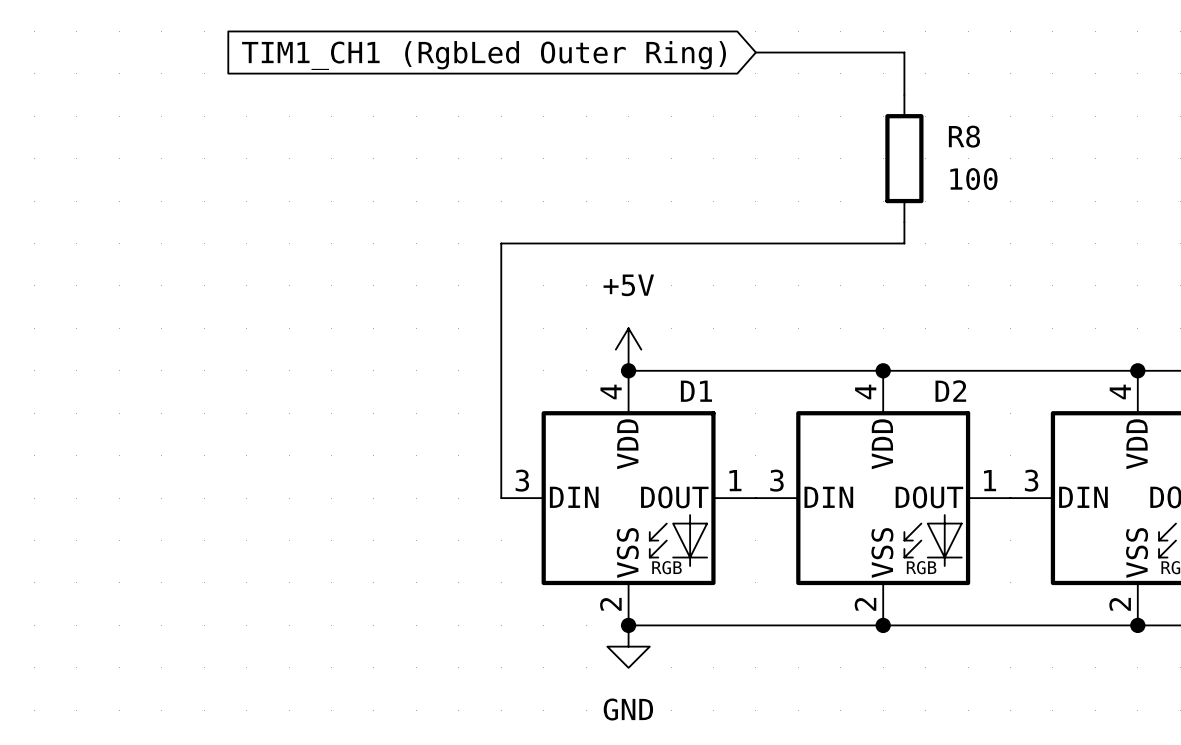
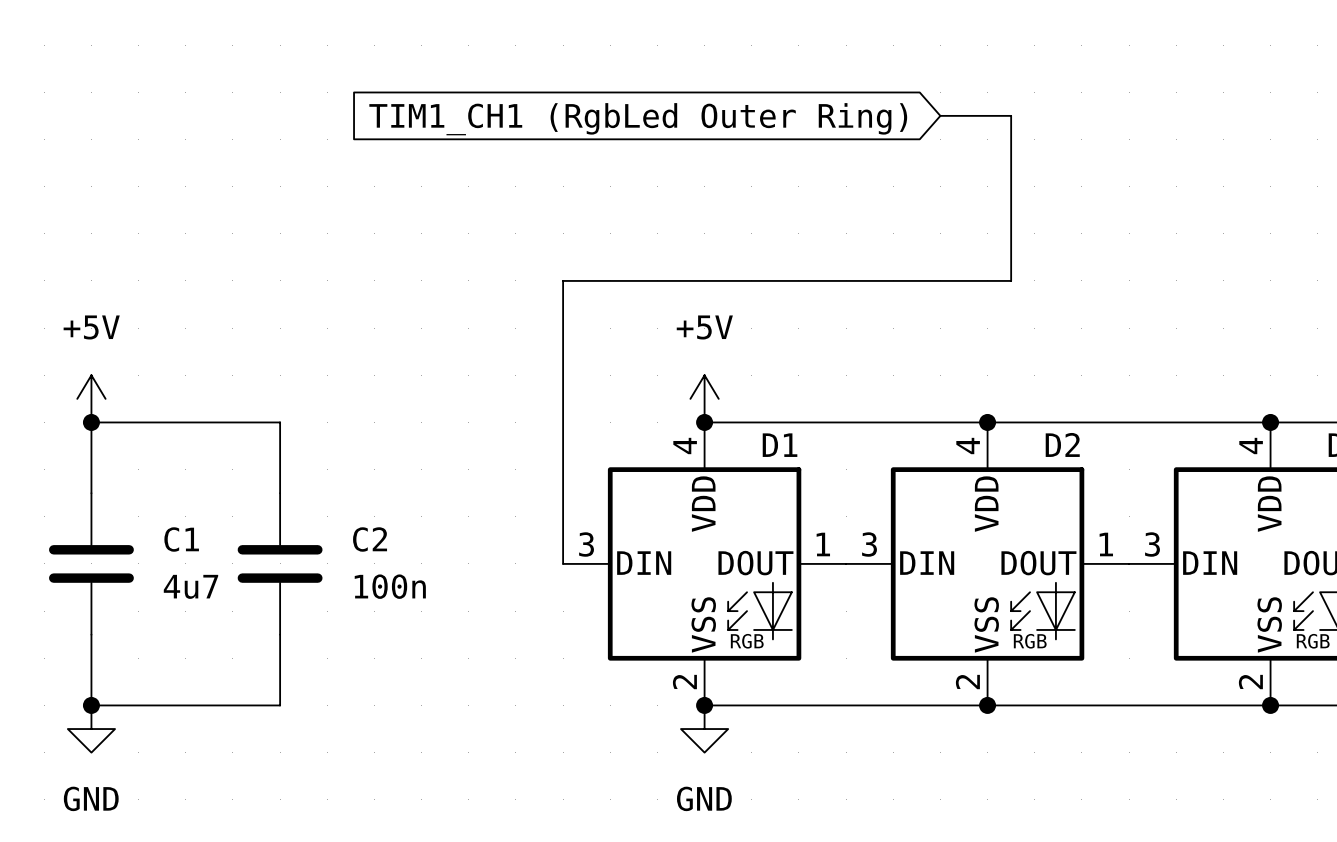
wire: (755, 52) (904, 52) (904, 94) -> none
global label position: TIM1_CH1 (RgbLed Outer Ring) (484, 55) -> TIM1_CH1 (RgbLed Outer Ring) (638, 119)
wire: none -> (940, 115) (1011, 115) (1011, 257)
R8: 100 (904, 158) -> none
power symbol: none -> +5V (91, 398)
junction: none -> (91, 422)
wire: none -> (91, 493) (91, 422) (280, 422) (280, 493)
C1: none -> 4u7 (91, 563)
C2: none -> 100n (280, 563)
wire: none -> (91, 634) (91, 705) (280, 705) (280, 634)
junction: none -> (91, 705)
power symbol: none -> GND (91, 729)

